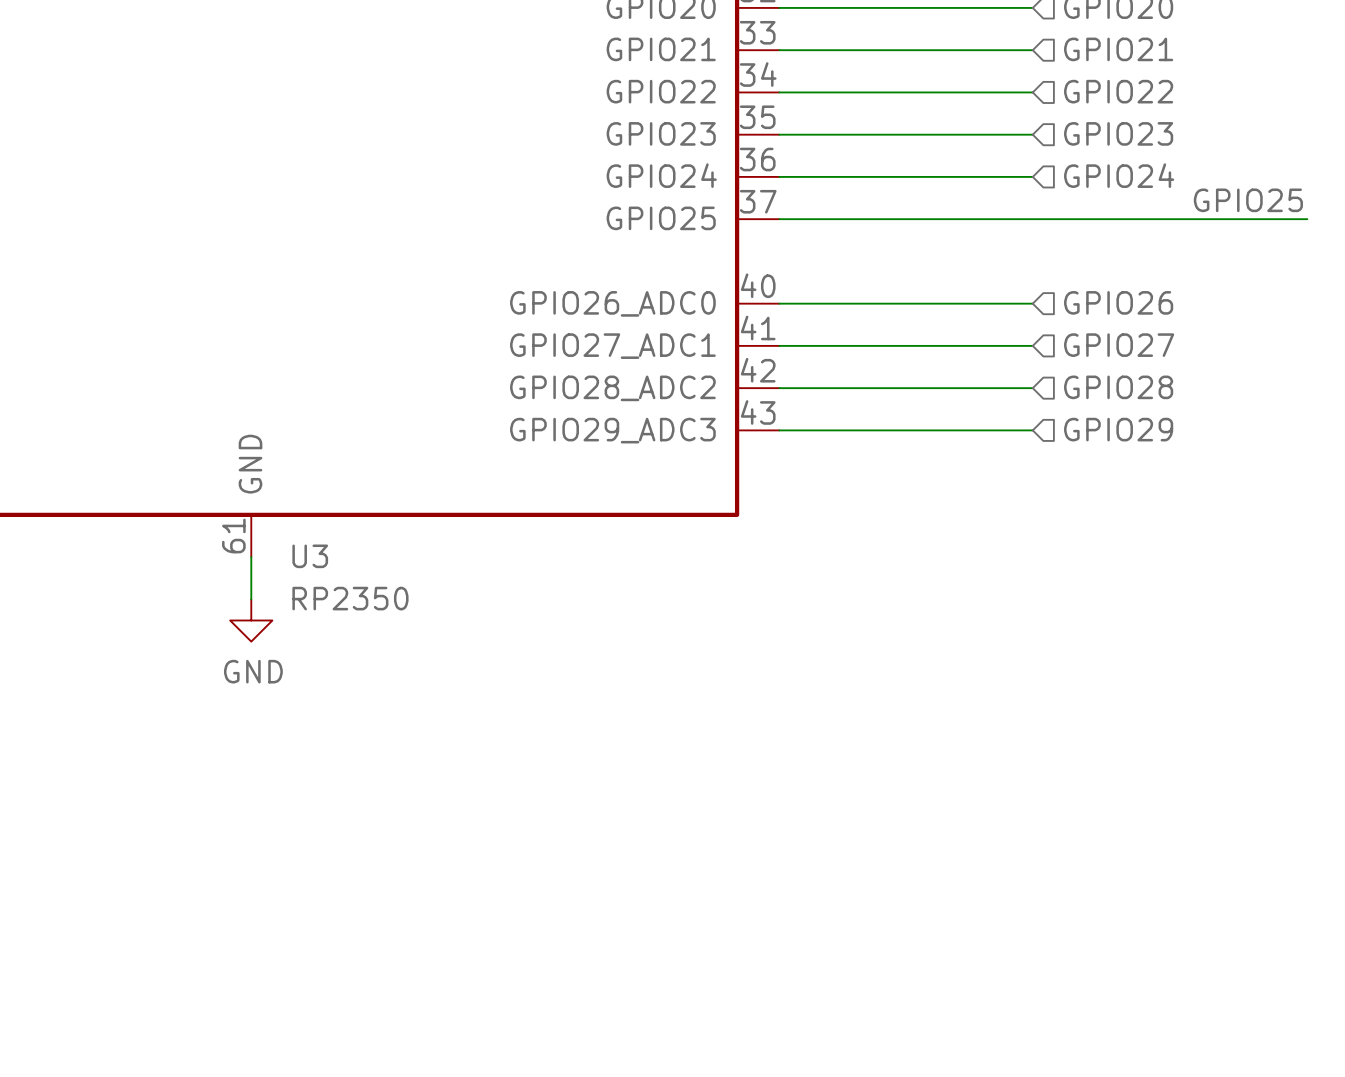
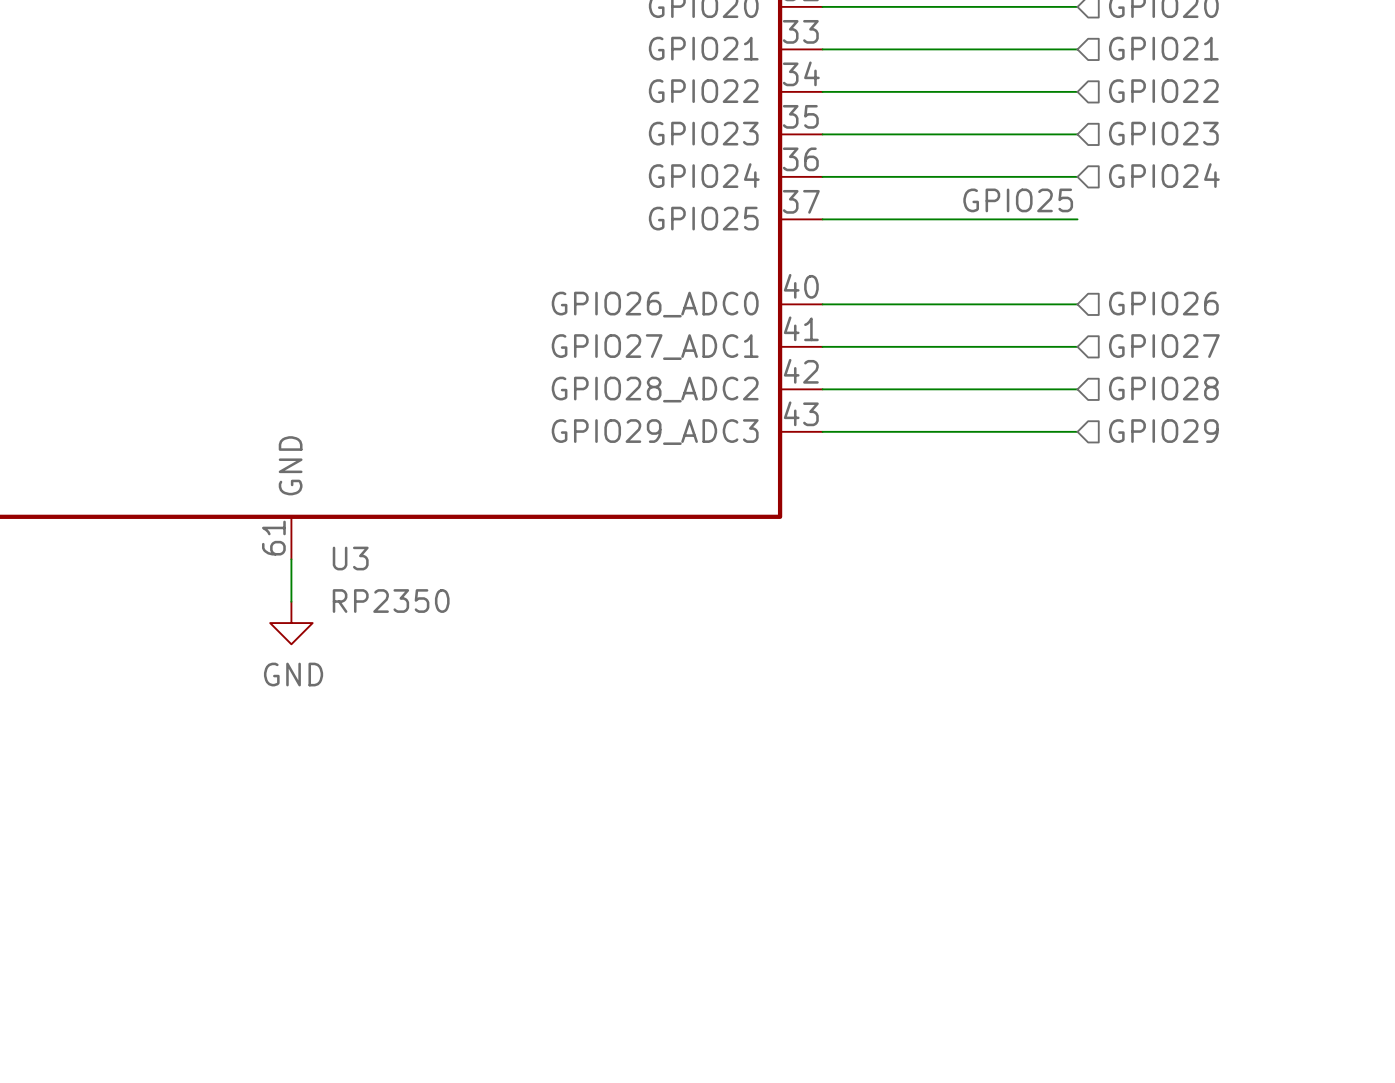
label position: GPIO25 (1248, 200) -> GPIO25 (1018, 200)
wire: (1032, 219) (1307, 219) -> none

